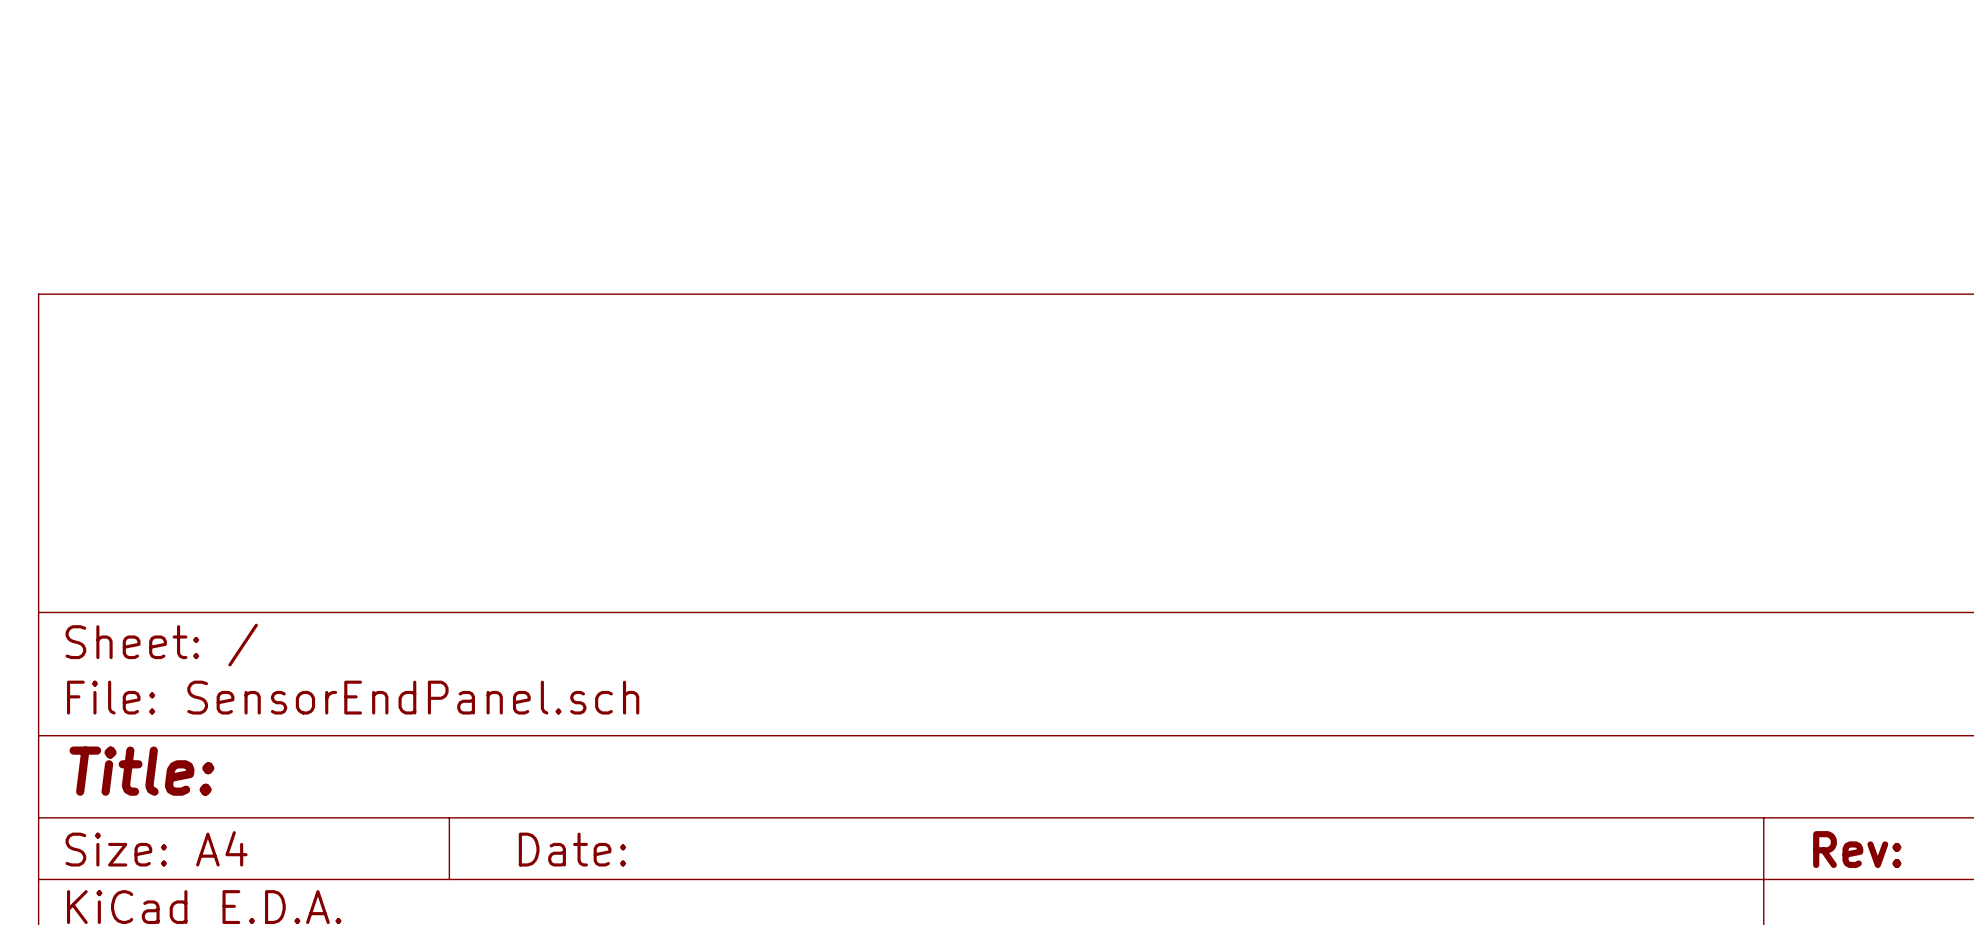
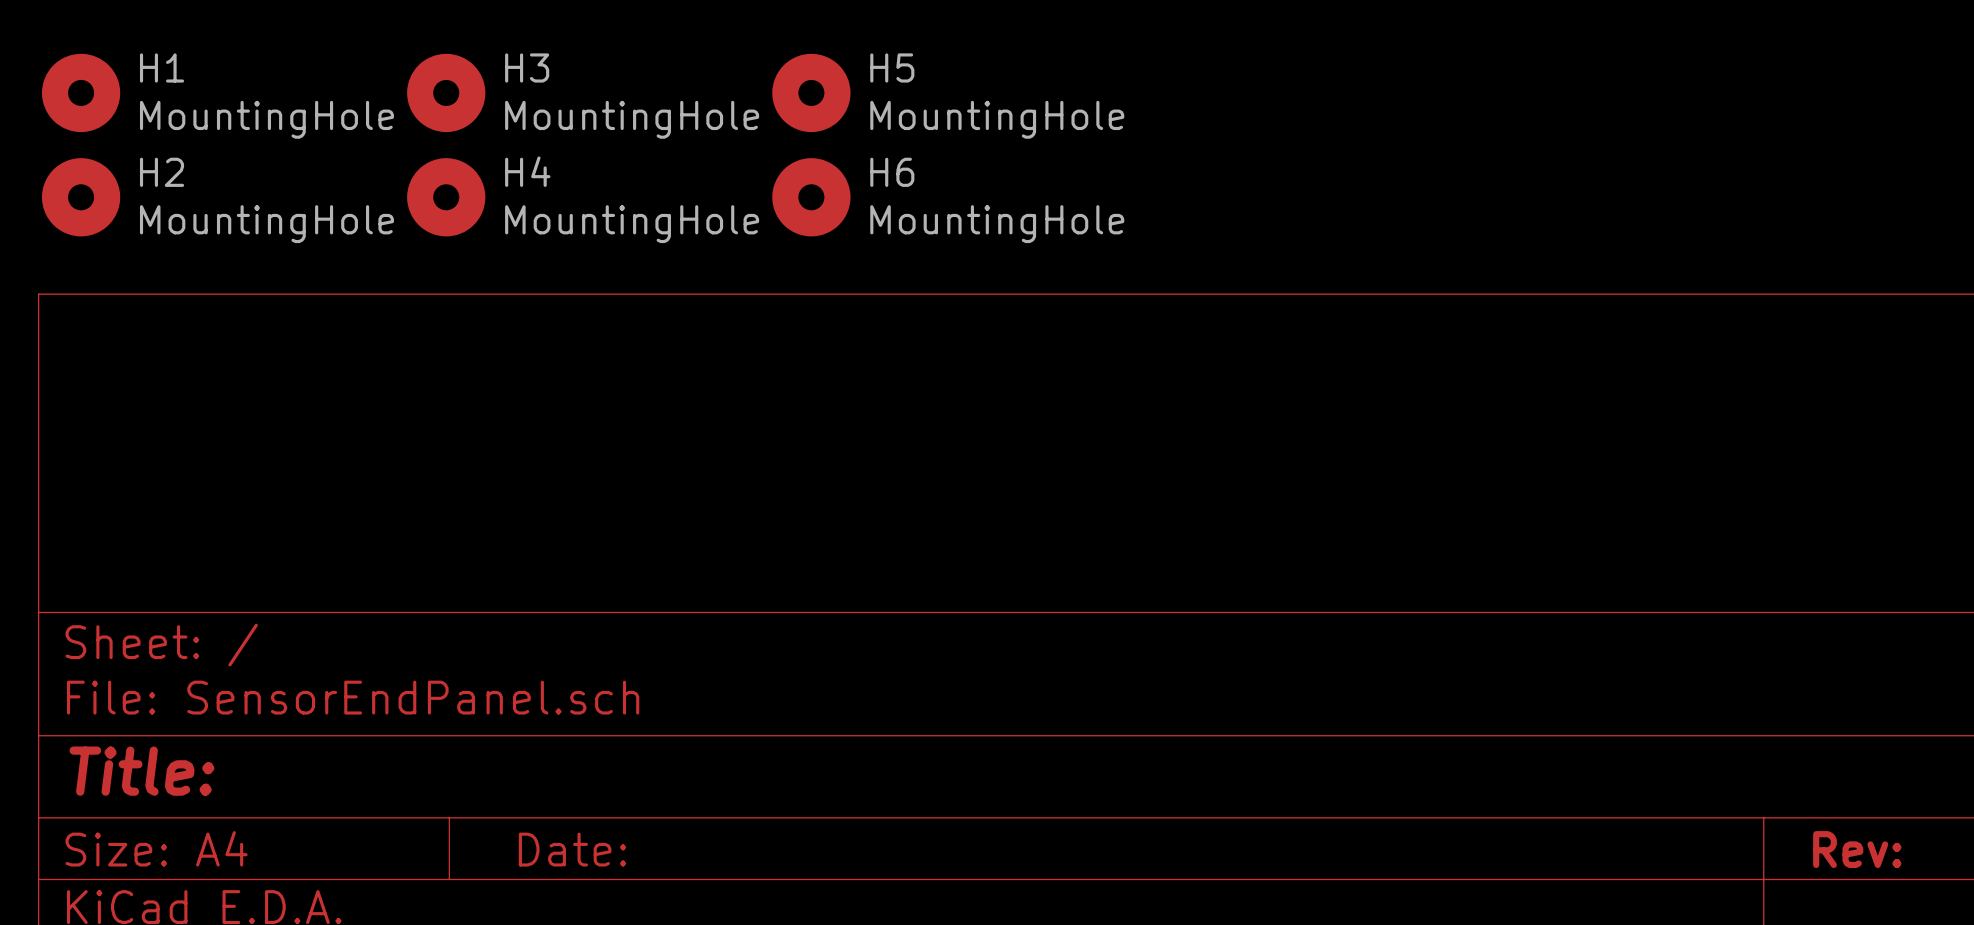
H1: none -> MountingHole (81, 92)
H3: none -> MountingHole (446, 92)
H5: none -> MountingHole (811, 92)
H2: none -> MountingHole (81, 197)
H4: none -> MountingHole (446, 197)
H6: none -> MountingHole (811, 197)

